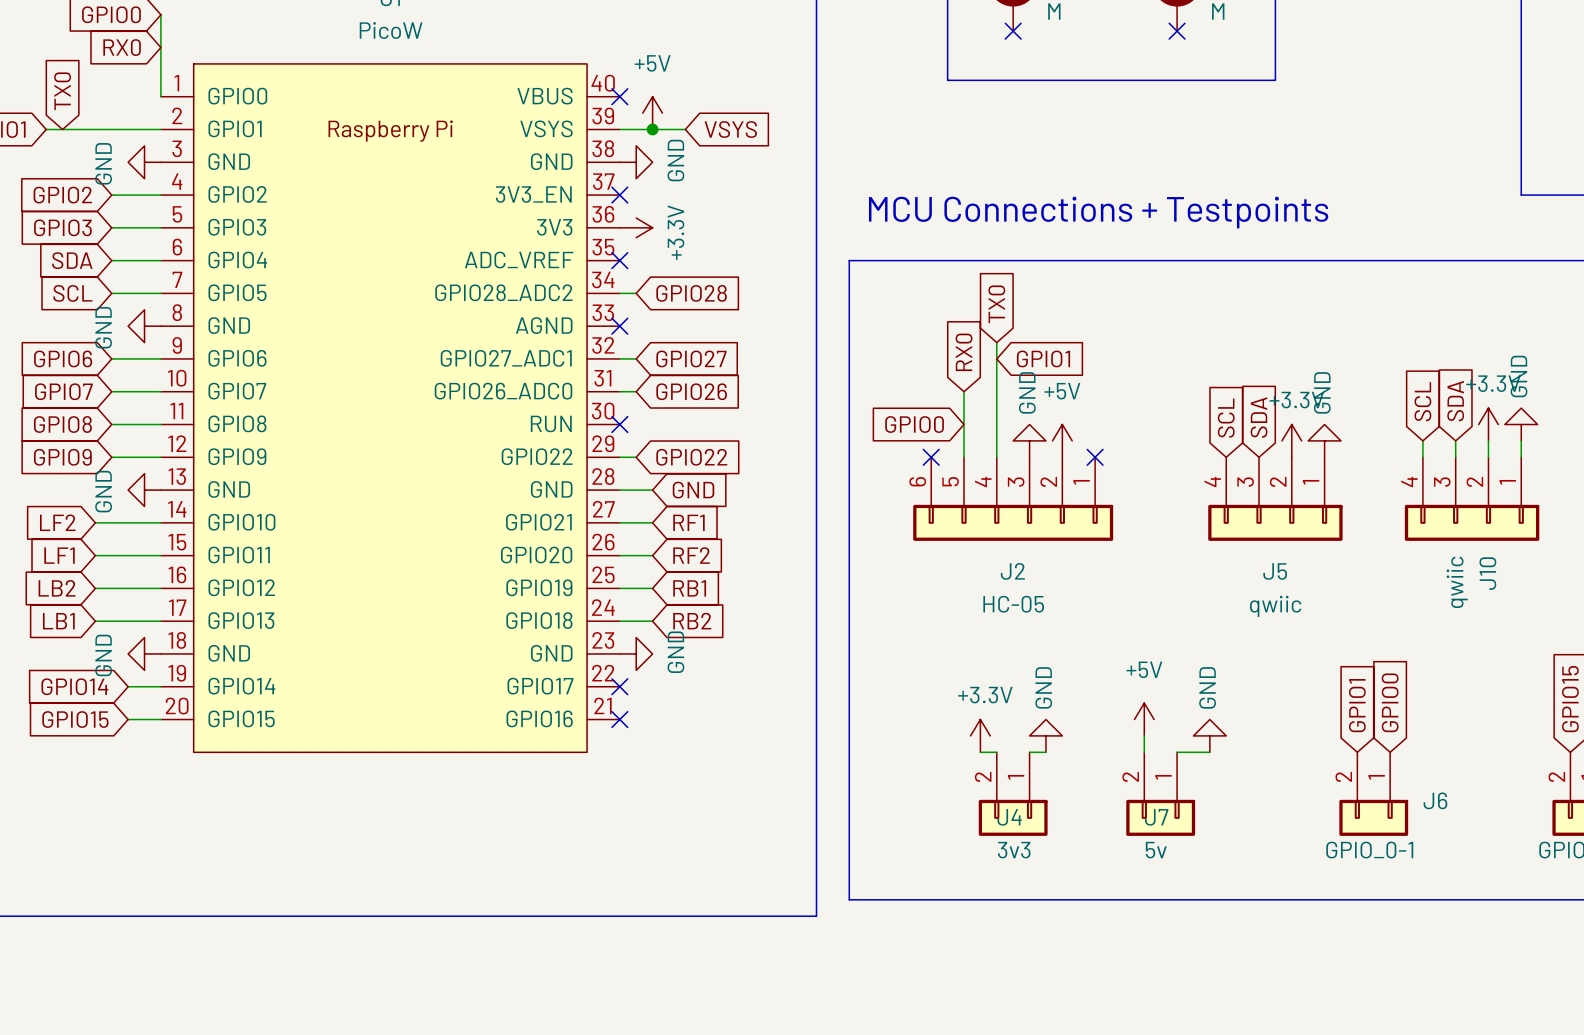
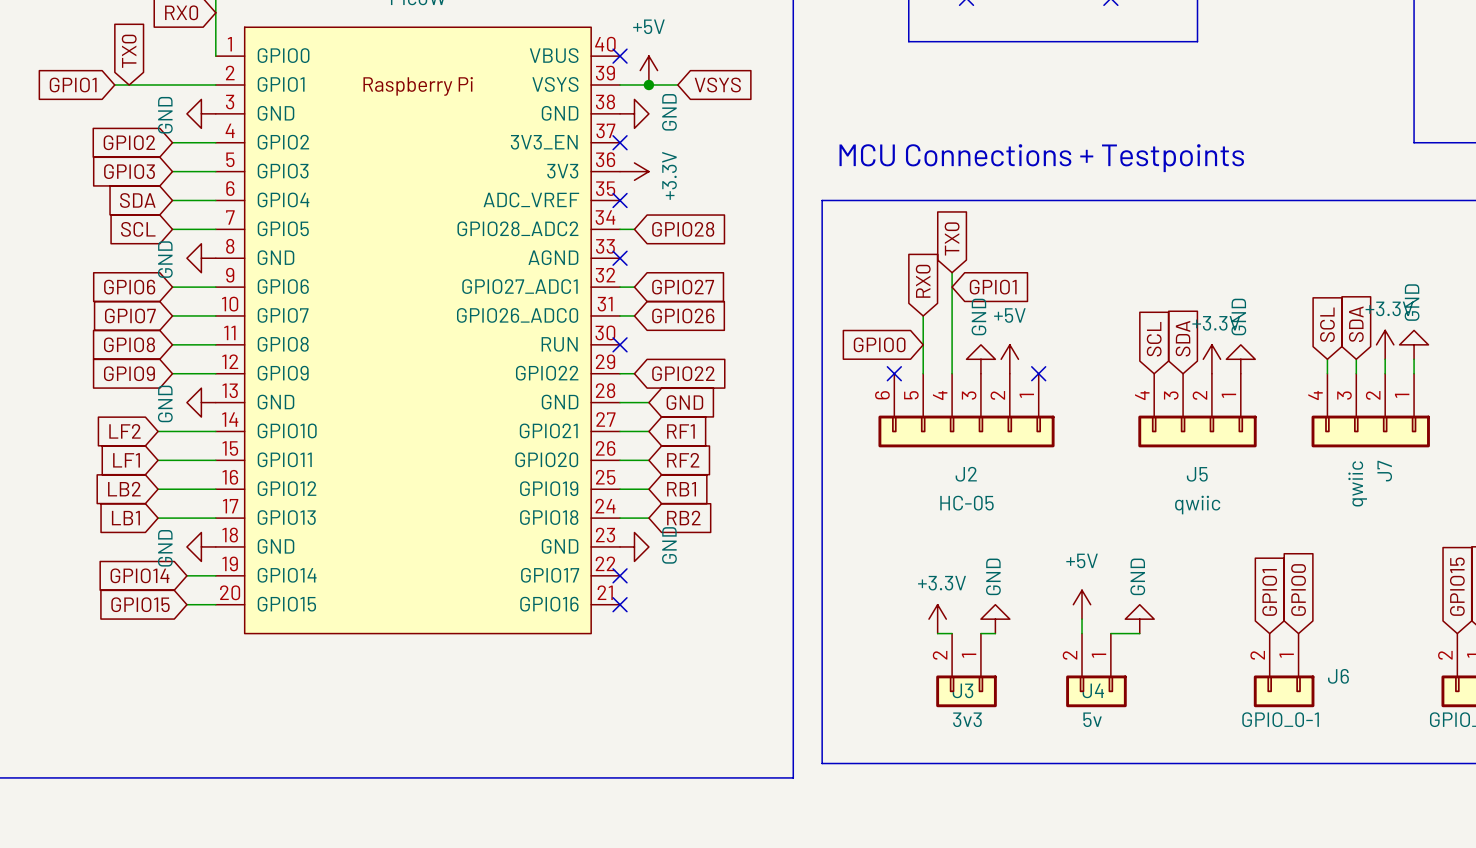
J10 name: J10 (1487, 573) -> J7 (1384, 471)
J4 name: J4 (1009, 817) -> J3 (962, 690)
J7 name: J7 (1156, 817) -> J4 (1093, 690)

